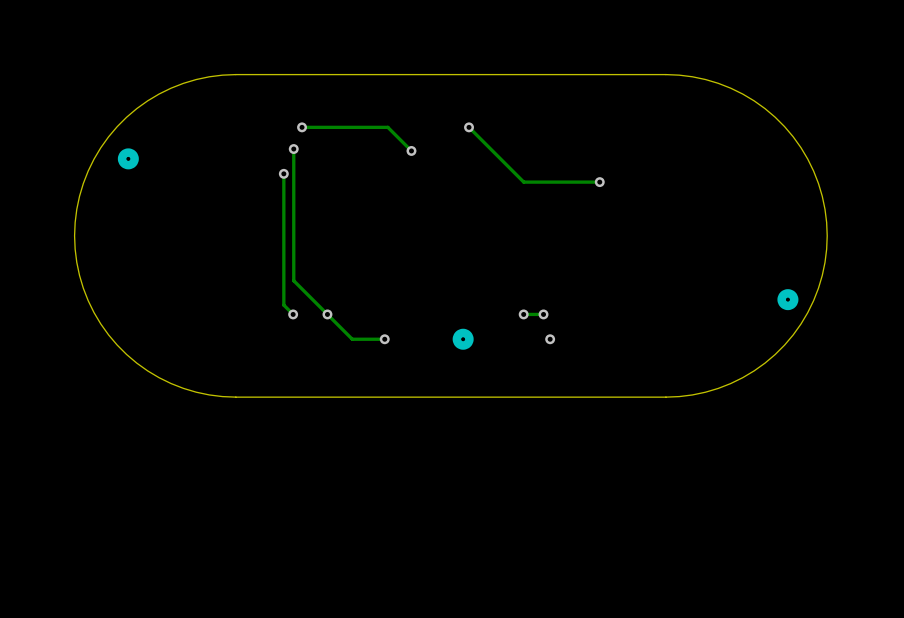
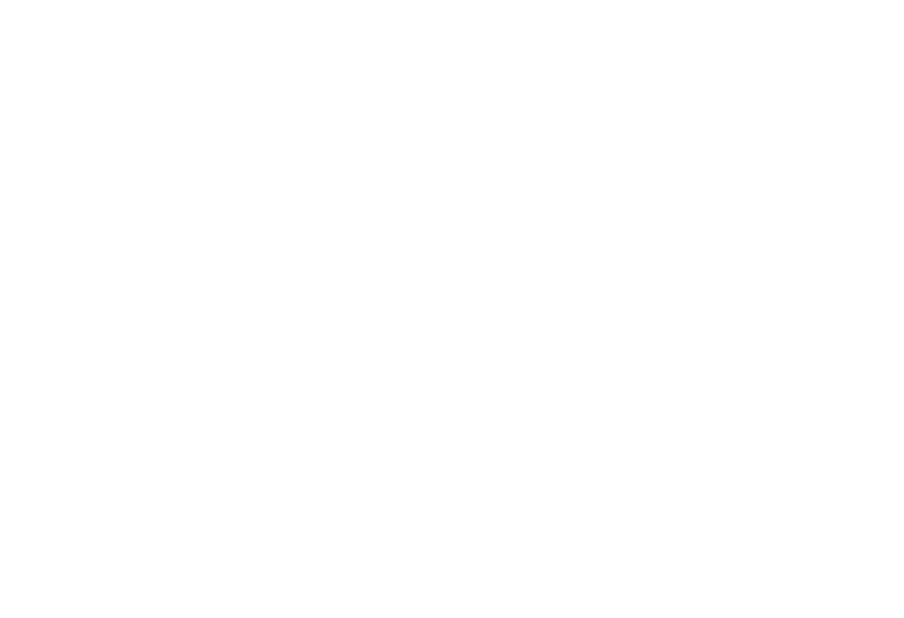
board edge: (665, 74) (235, 74) (209, 76) (183, 83) (147, 100) (126, 117) (108, 136) (88, 171) (79, 196) (75, 222) (75, 249) (83, 288) (100, 324) (126, 354) (147, 370) (171, 383) (209, 394) (235, 397) (665, 397) (692, 394) (718, 388) (742, 377) (764, 363) (784, 345) (800, 324) (813, 300) (822, 275) (826, 249) (825, 209) (818, 183) (800, 147) (784, 126) (764, 108) (742, 94) (718, 83) (692, 76) (665, 74) -> none
track: (302, 127) (387, 127) (411, 150) -> none
via: (302, 127) -> none
track: (469, 127) (523, 182) (599, 182) -> none
via: (469, 127) -> none
track: (293, 149) (293, 280) (352, 339) (384, 339) -> none
via: (293, 149) -> none
via: (411, 150) -> none
part: (128, 158) -> none
track: (283, 173) (283, 305) (293, 314) -> none
via: (283, 173) -> none
via: (599, 182) -> none
part: (787, 299) -> none
via: (293, 314) -> none
via: (327, 314) -> none
via: (523, 314) -> none
track: (543, 314) (523, 314) -> none
via: (543, 314) -> none
via: (384, 339) -> none
part: (463, 339) -> none
via: (550, 339) -> none

